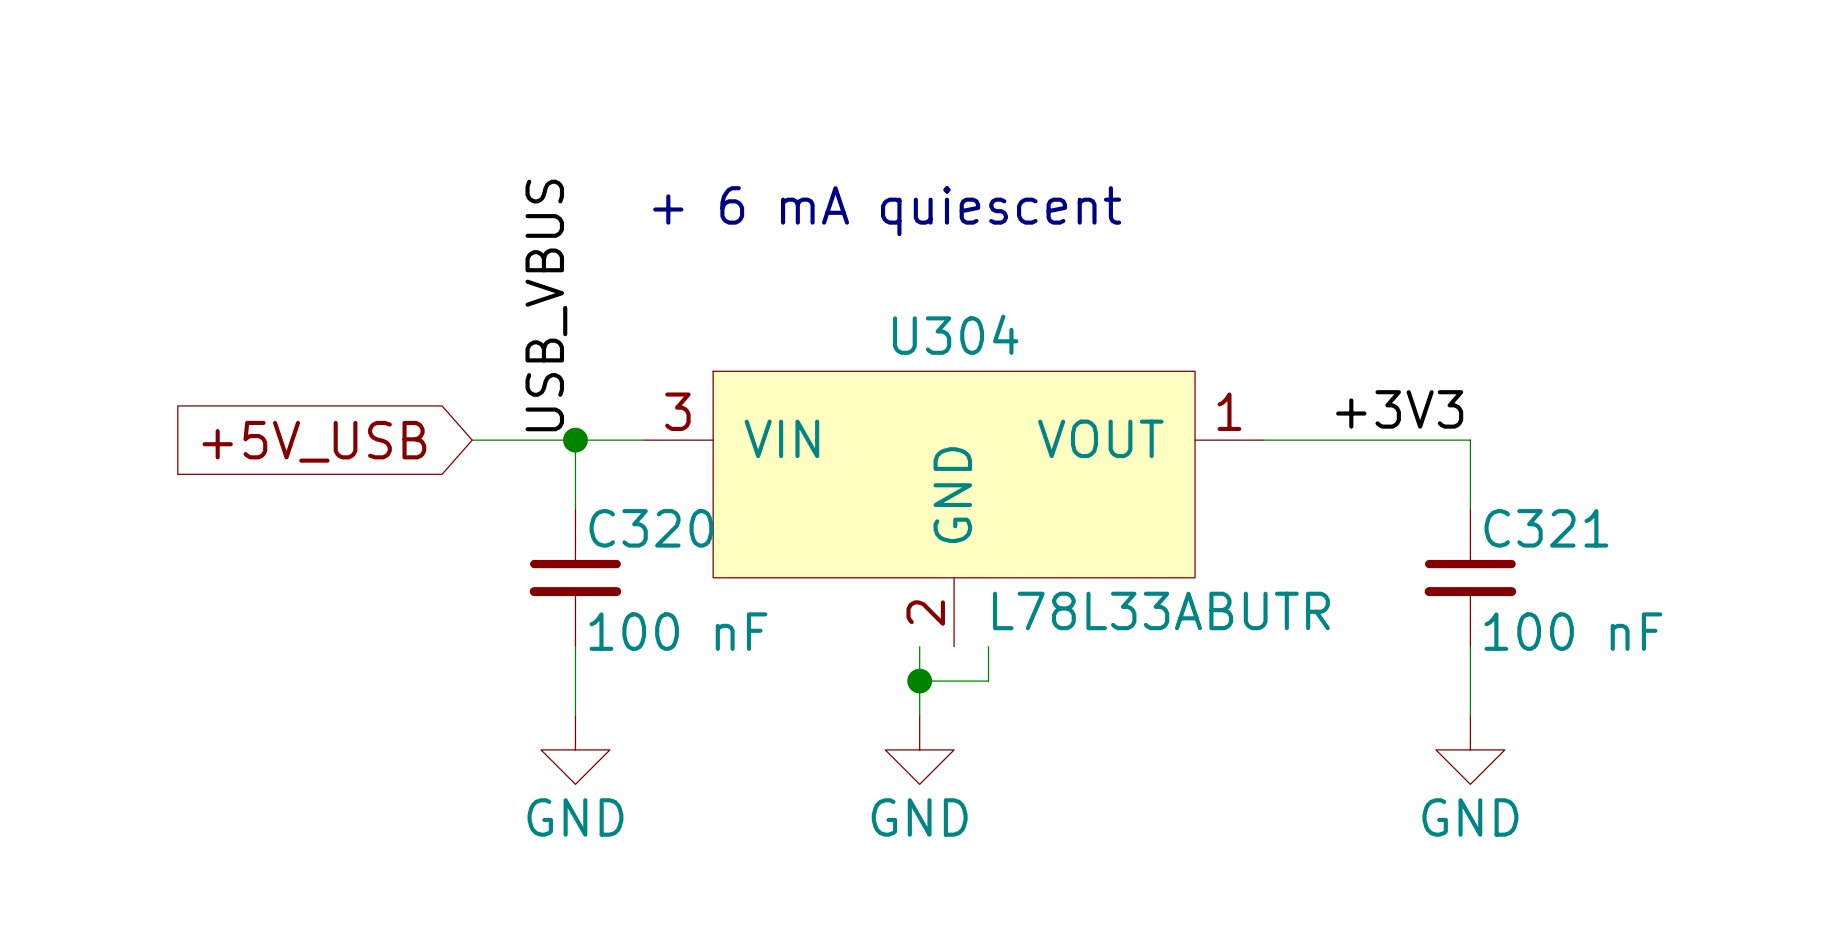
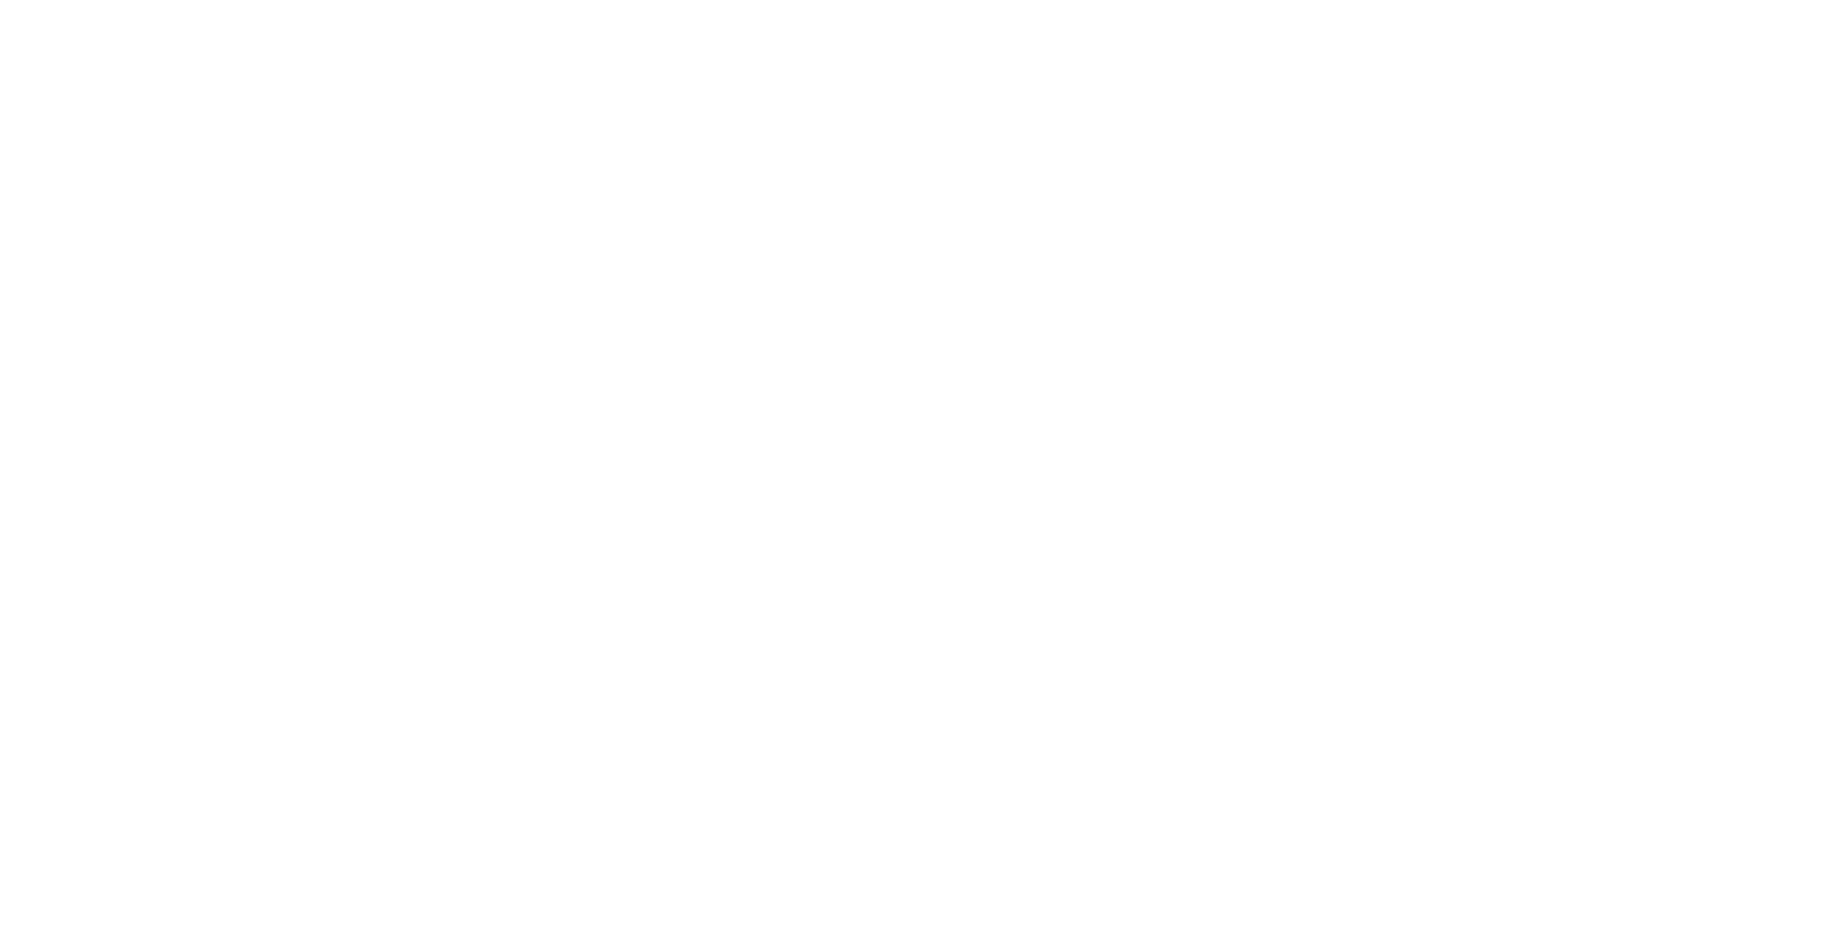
text: + 6 mA quiescent (887, 211) -> none
label: USB_VBUS (546, 305) -> none
label: +3V3 (1399, 409) -> none
wire: (472, 440) (644, 440) -> none
wire: (575, 440) (575, 508) -> none
junction: (575, 440) -> none
wire: (1263, 440) (1470, 440) (1470, 508) -> none
global label: +5V_USB (314, 441) -> none
U304: L78L33ABUTR (954, 508) -> none
C320: 100 nF (575, 577) -> none
C321: 100 nF (1470, 577) -> none
wire: (575, 646) (575, 715) -> none
wire: (919, 646) (919, 715) -> none
wire: (988, 646) (988, 681) (919, 681) -> none
wire: (1470, 646) (1470, 715) -> none
junction: (919, 681) -> none
power symbol: GND (575, 749) -> none
power symbol: GND (919, 749) -> none
power symbol: GND (1470, 749) -> none

